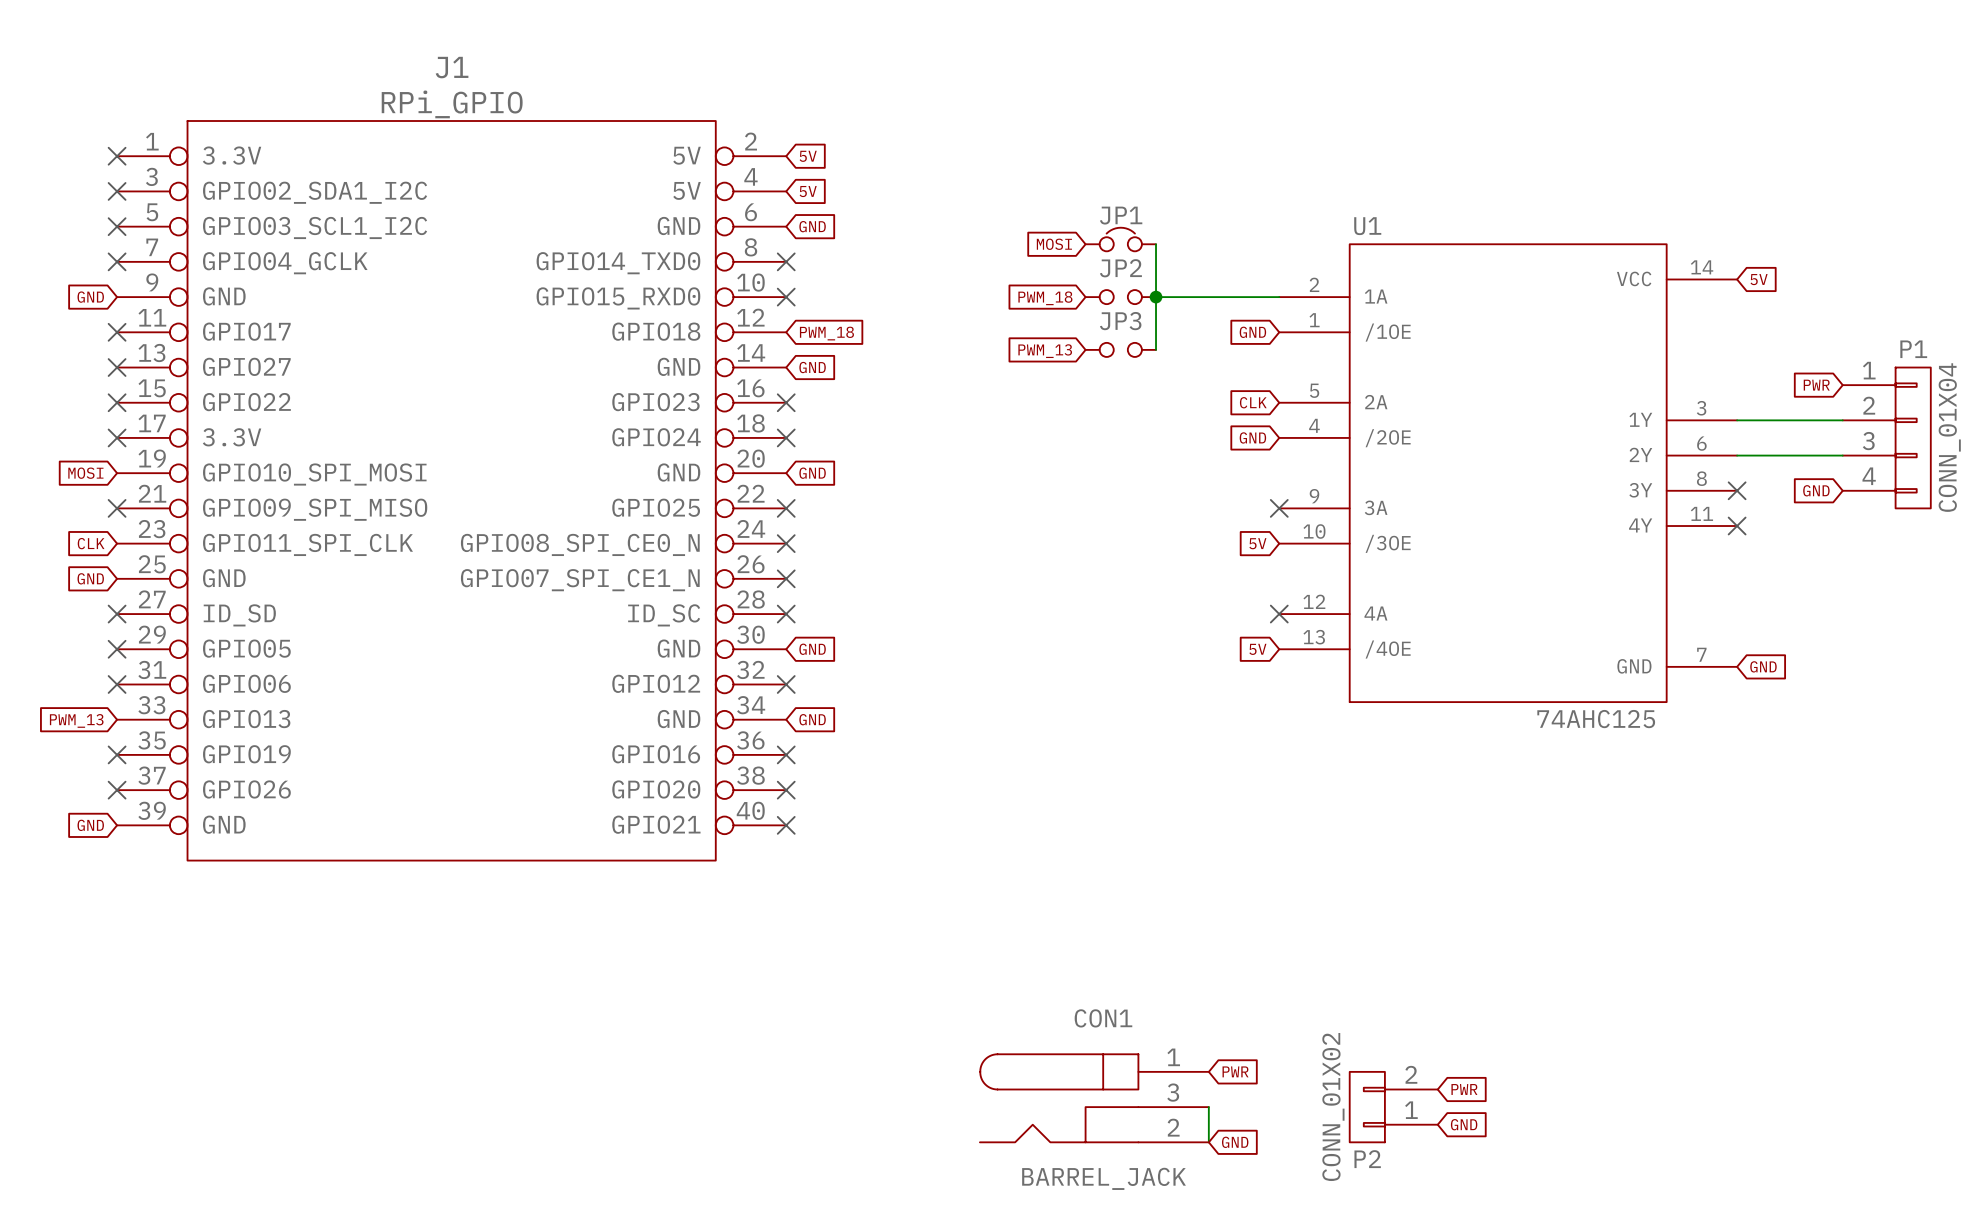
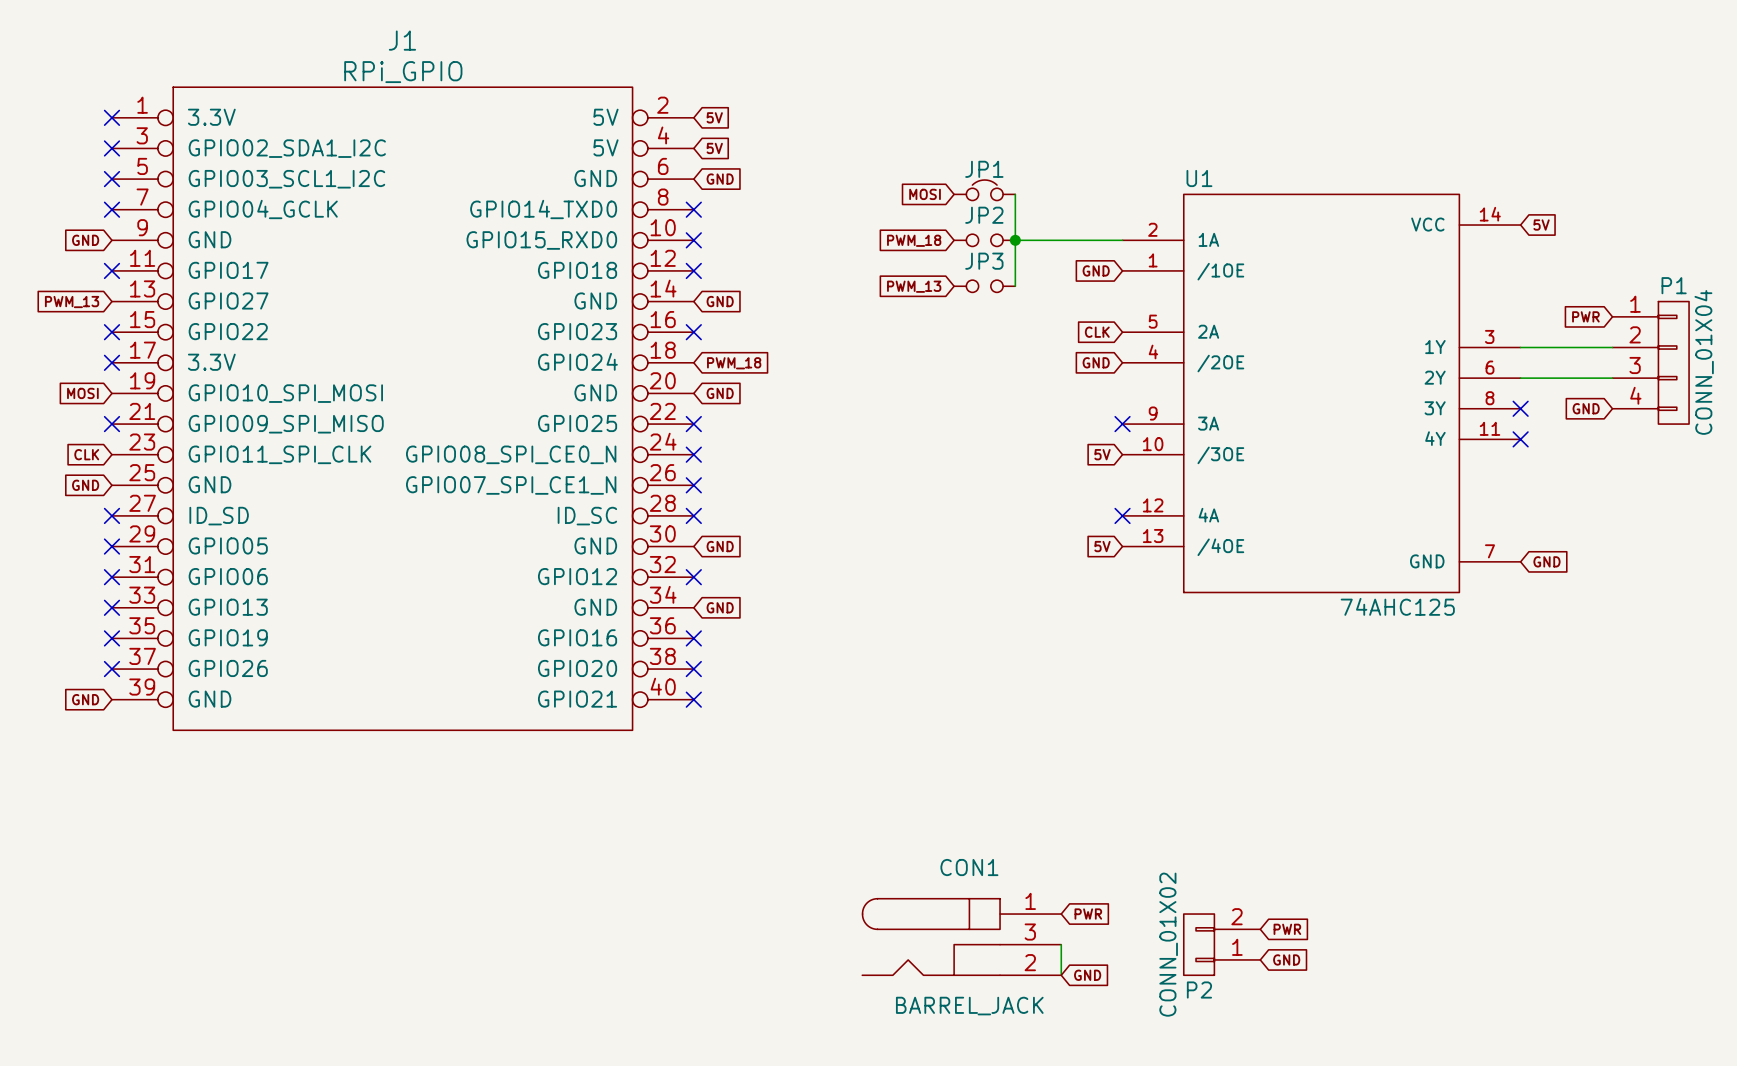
no-connect mark: none -> (693, 270)
global label position: PWM_18 (826, 333) -> PWM_18 (734, 363)
no-connect mark: (117, 367) -> none
global label: none -> PWM_13 (72, 302)
no-connect mark: (786, 437) -> none
no-connect mark: none -> (111, 607)
global label: PWM_13 (76, 720) -> none

